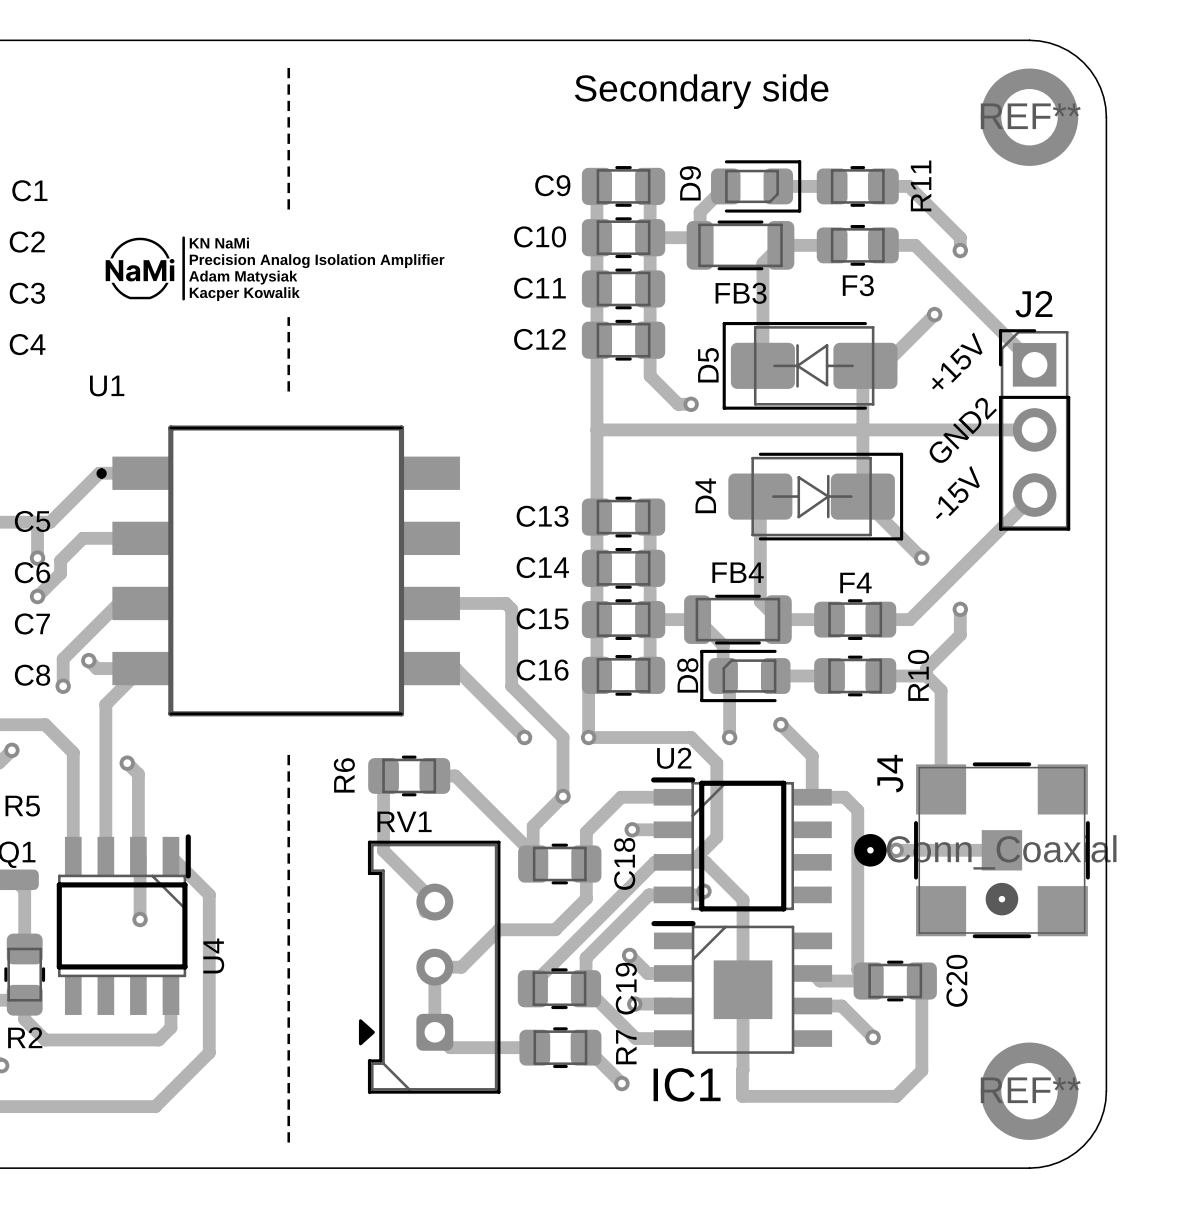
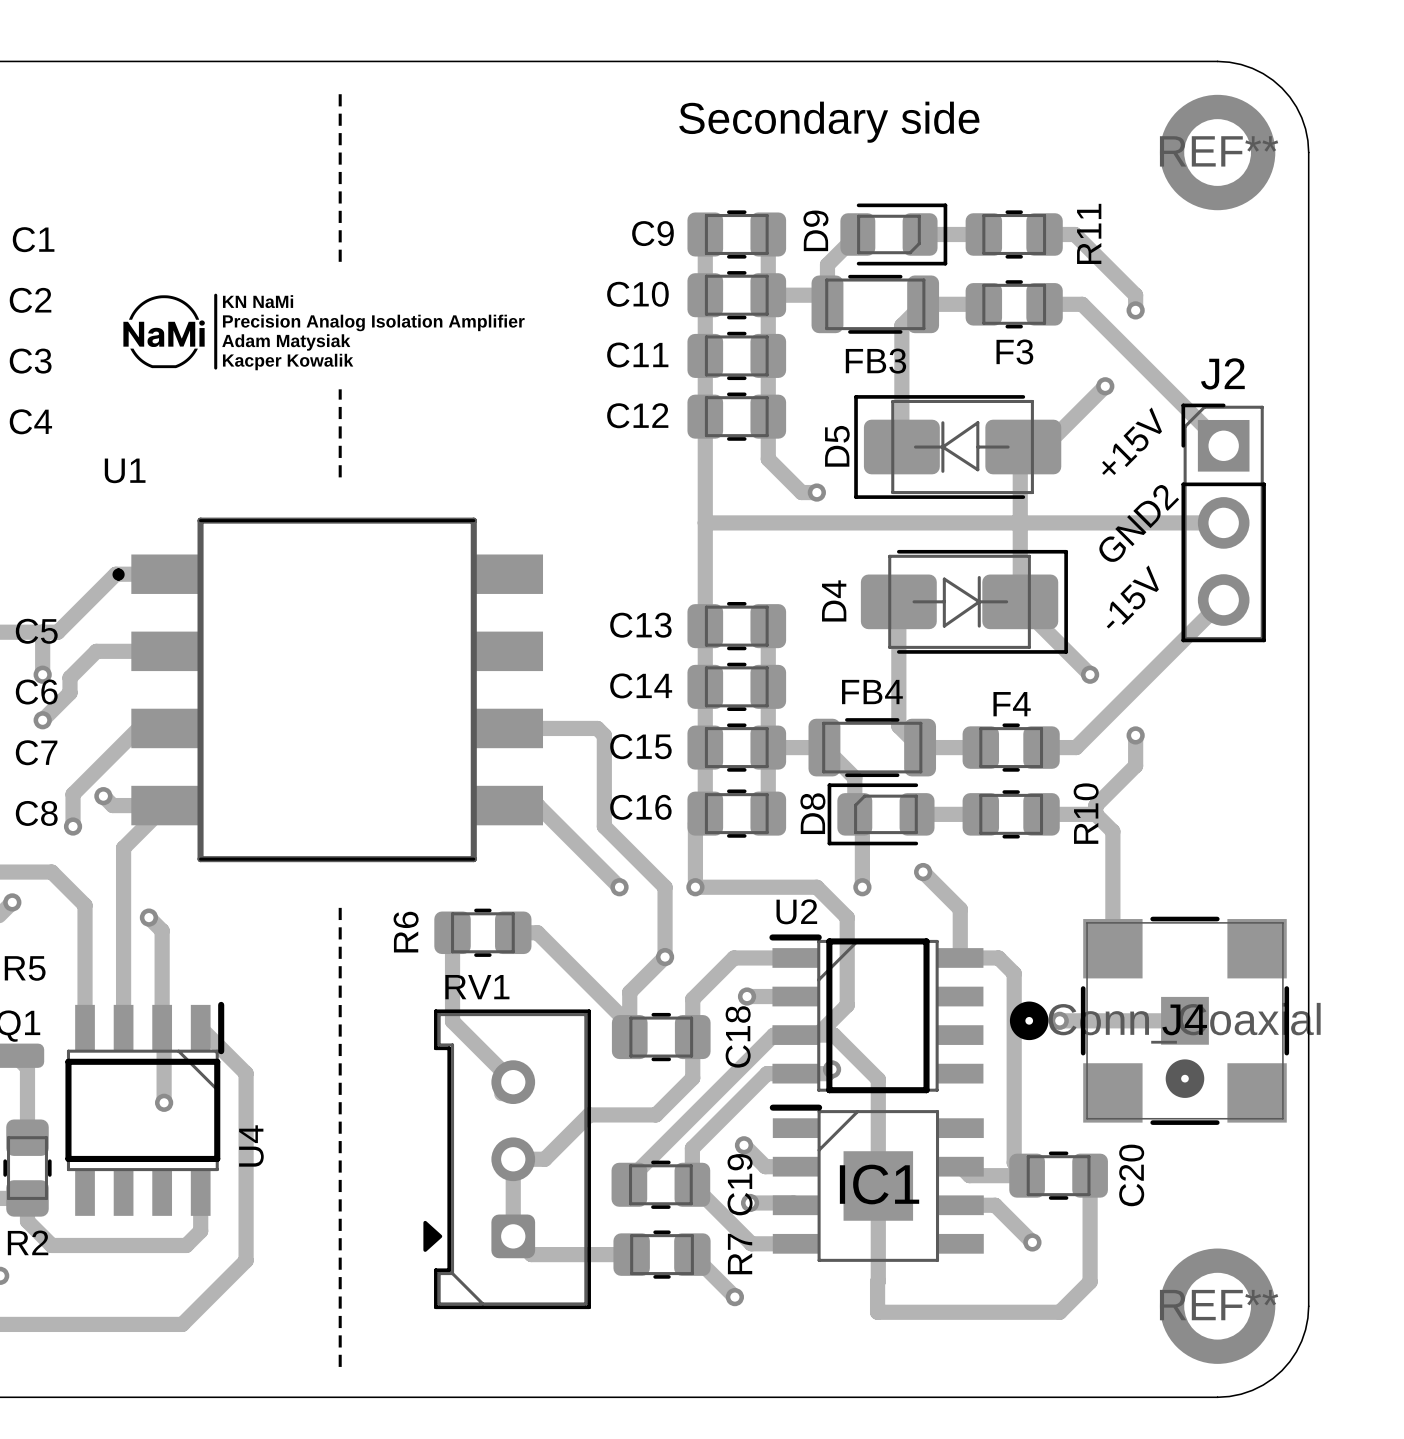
J4 name rotation: 0° (890, 773) -> 90° clockwise (1184, 1019)
J4 name position: J4 (890, 773) -> J4 (1184, 1019)
IC1 name position: IC1 (687, 1084) -> IC1 (879, 1184)

